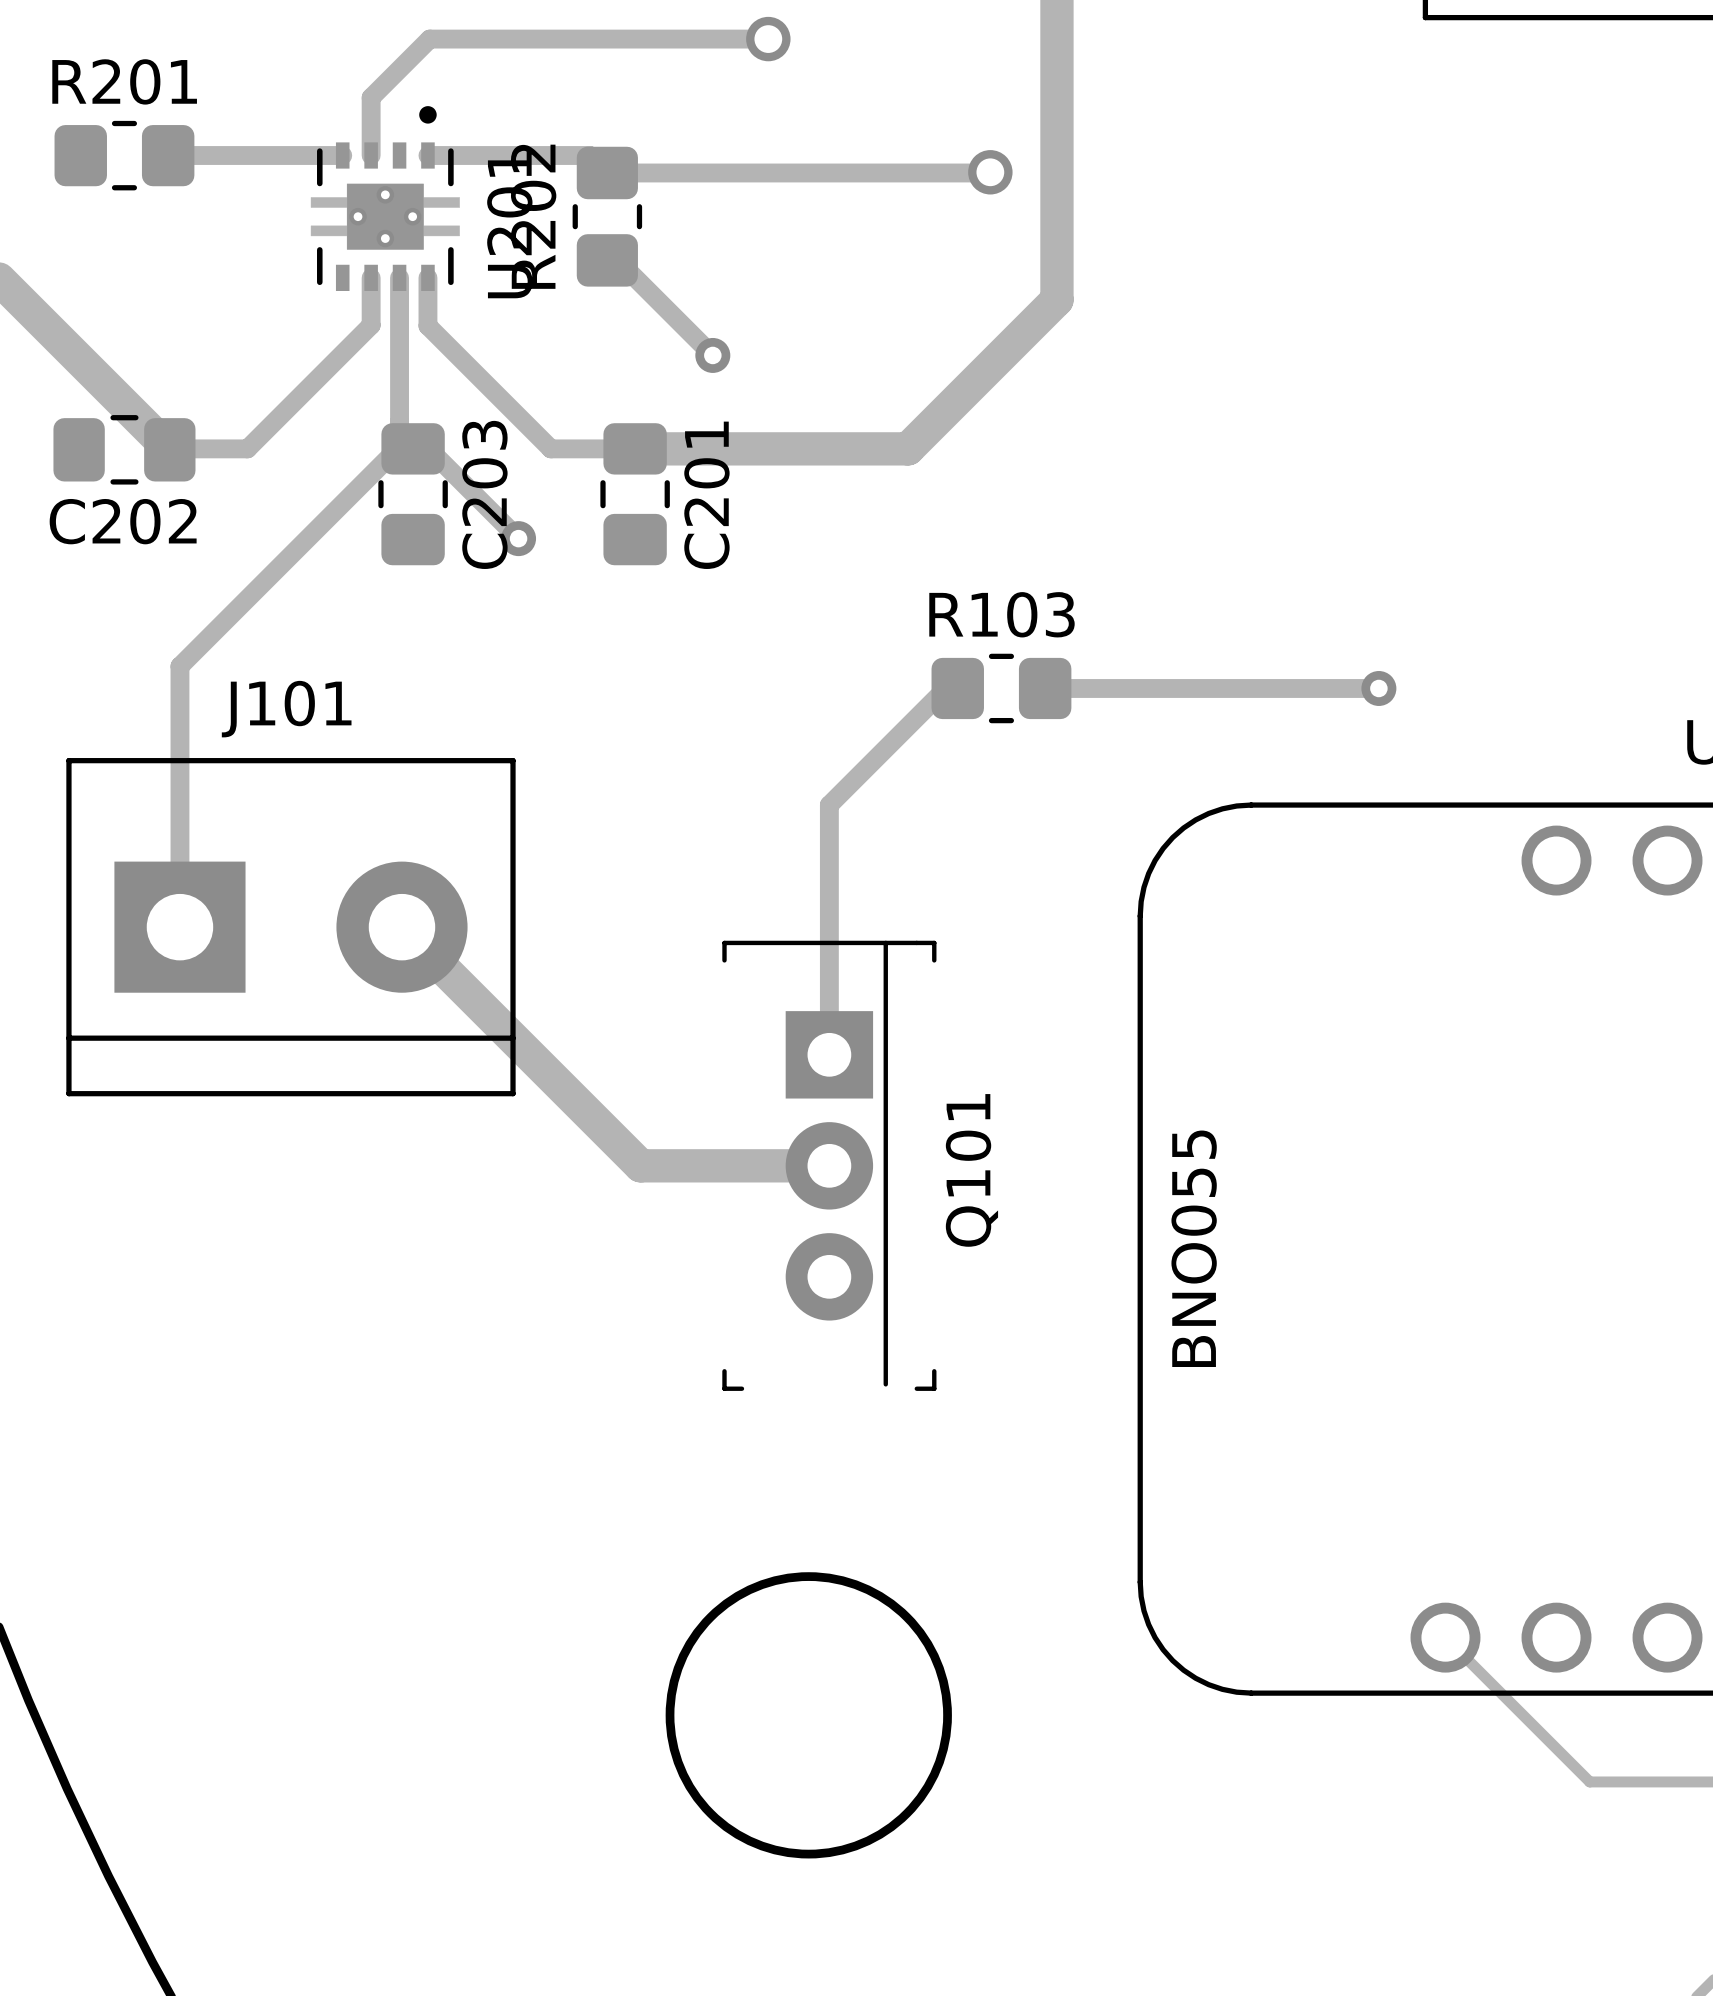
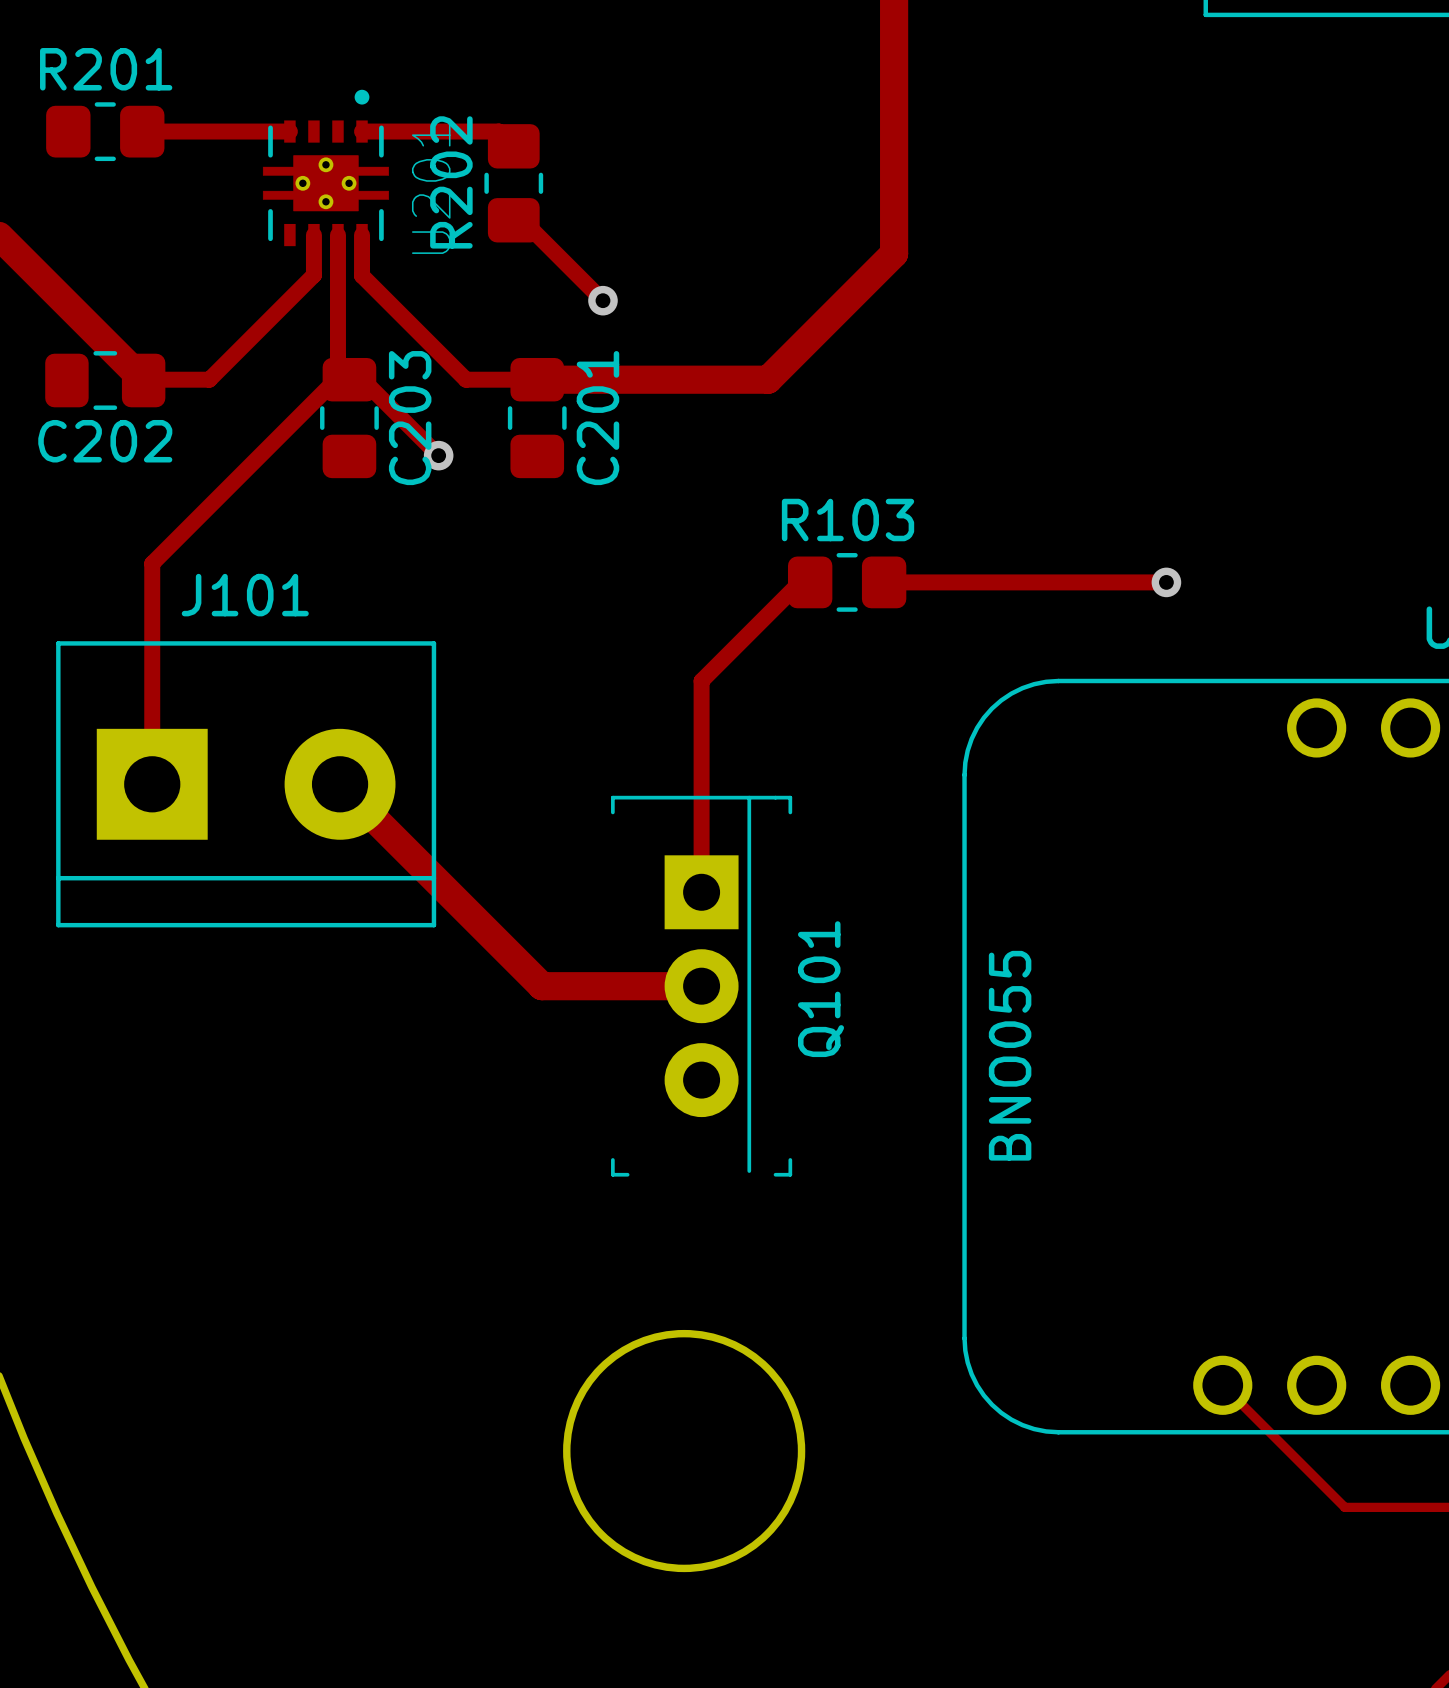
track: (768, 39) (429, 39) (371, 97) (371, 155) -> none
via: (768, 39) -> none
track: (990, 172) (607, 172) -> none
via: (990, 172) -> none

